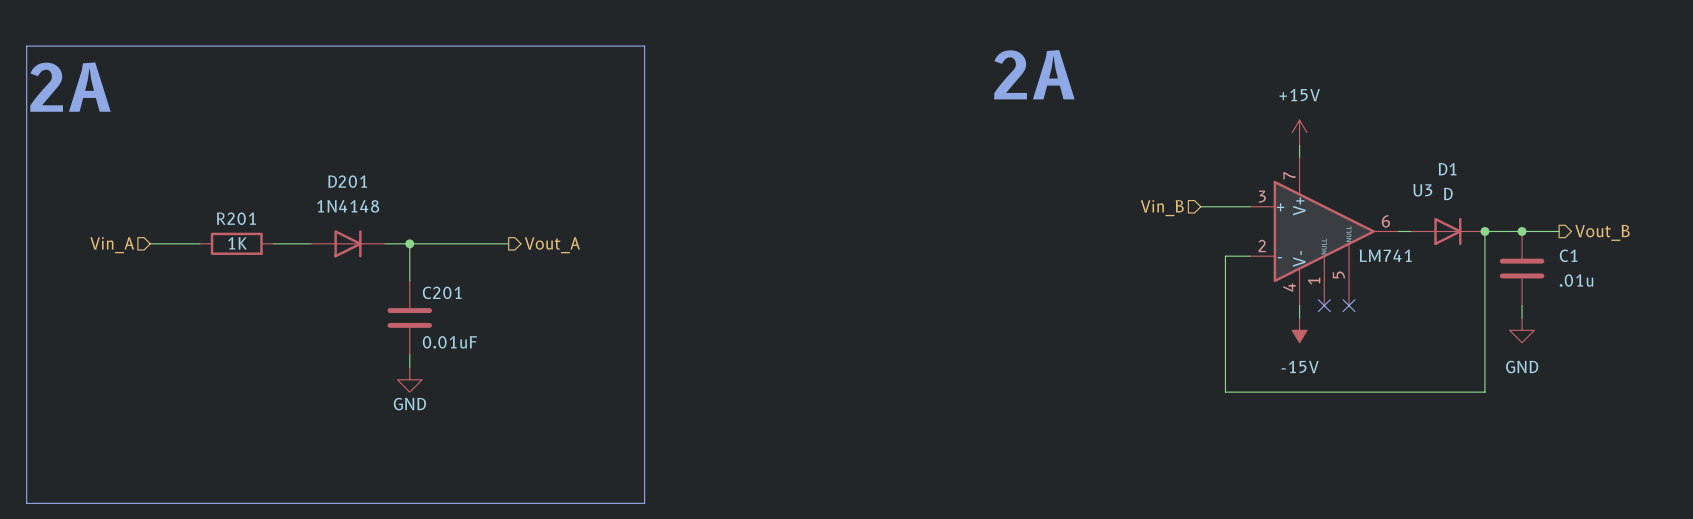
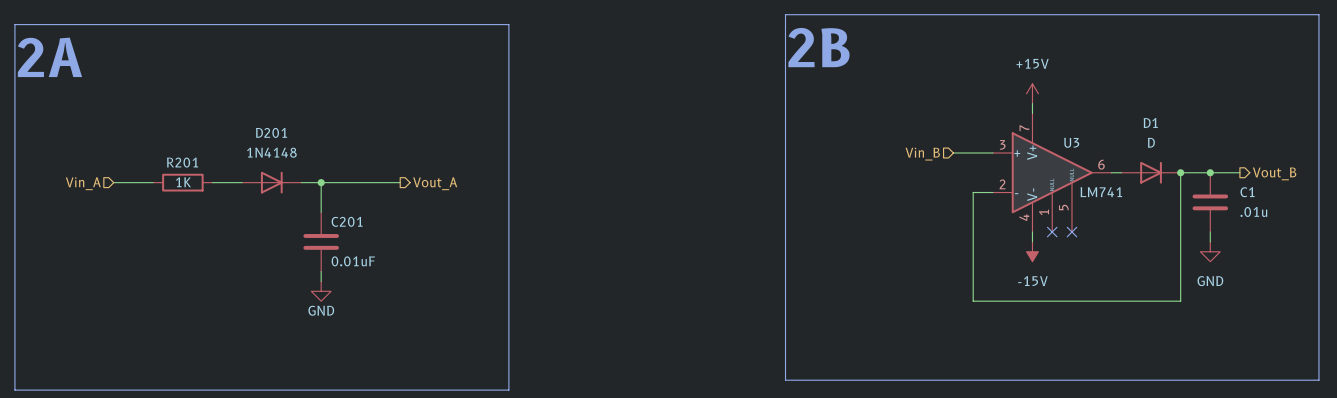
line: none -> (785, 14) (1318, 14) (1318, 380) (785, 380) (785, 14)
text: 2A (1034, 74) -> 2B (818, 47)
U3 name position: U3 (1422, 190) -> U3 (1071, 142)

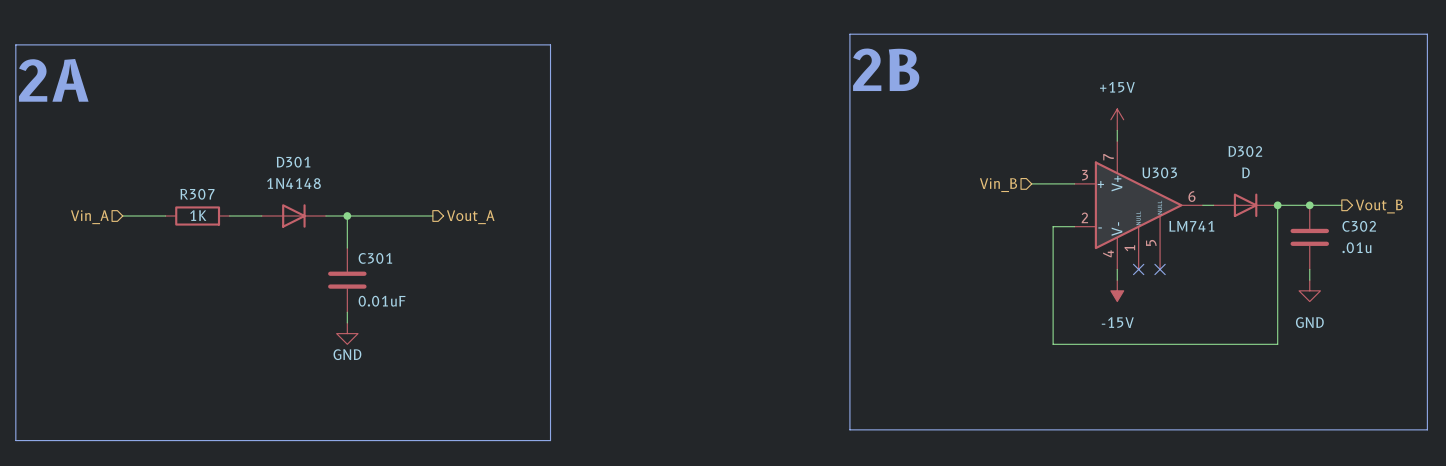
D1 name: D1 (1150, 122) -> D302 (1245, 151)
D201 name: D201 (271, 132) -> D301 (293, 162)
U3 name: U3 (1071, 142) -> U303 (1159, 172)
R201 name: R201 (182, 162) -> R307 (197, 194)
C1 name: C1 (1247, 192) -> C302 (1359, 226)
C201 name: C201 (347, 221) -> C301 (375, 258)

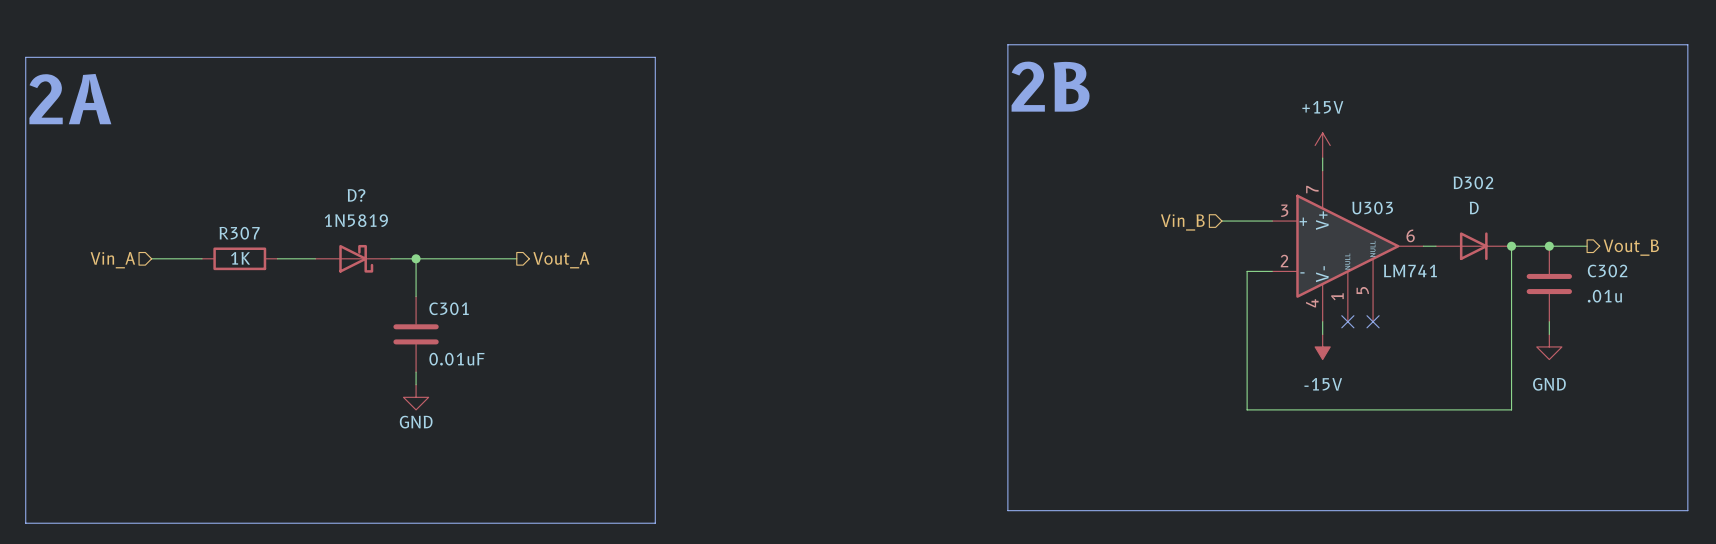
D301: 1N4148 (293, 215) -> none
D?: none -> 1N5819 (353, 258)

